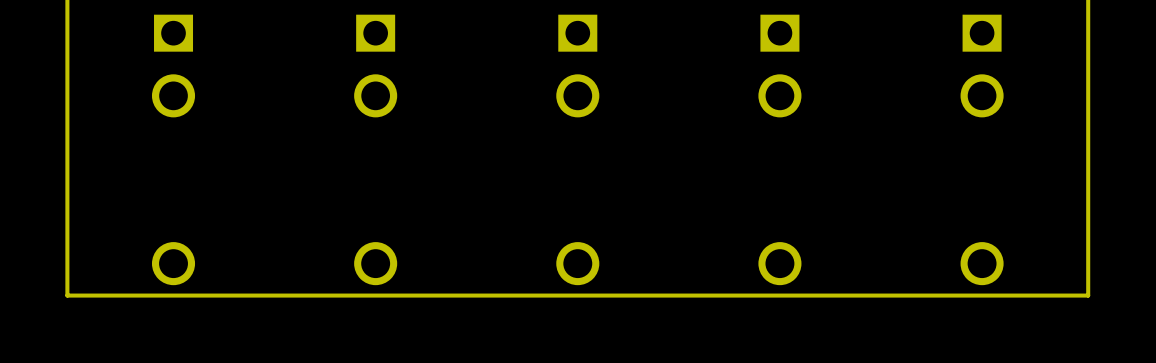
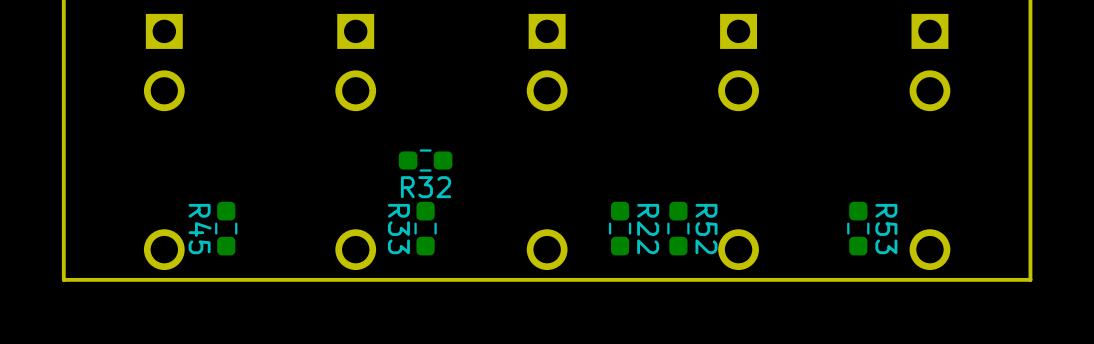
R32: none -> (425, 160)
R45: none -> (226, 228)
R33: none -> (425, 228)
R22: none -> (620, 228)
R52: none -> (678, 228)
R53: none -> (858, 228)

